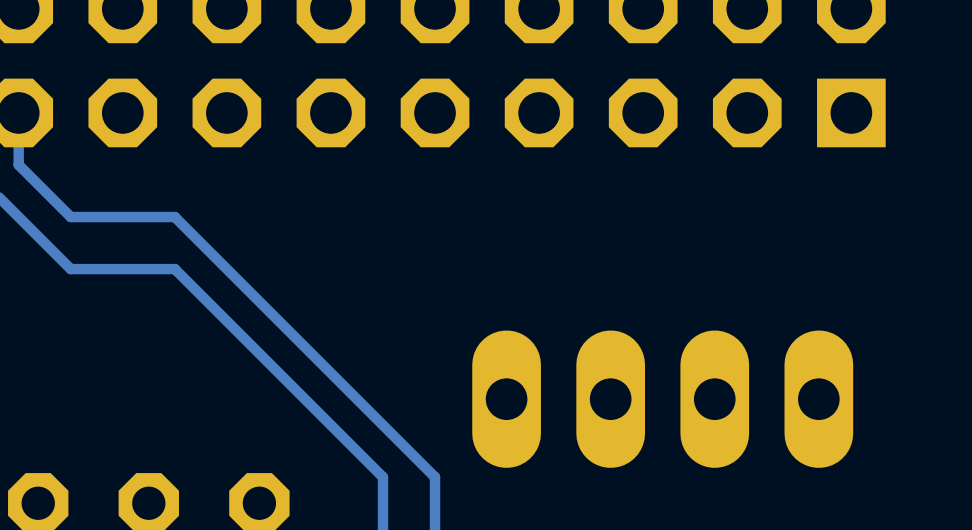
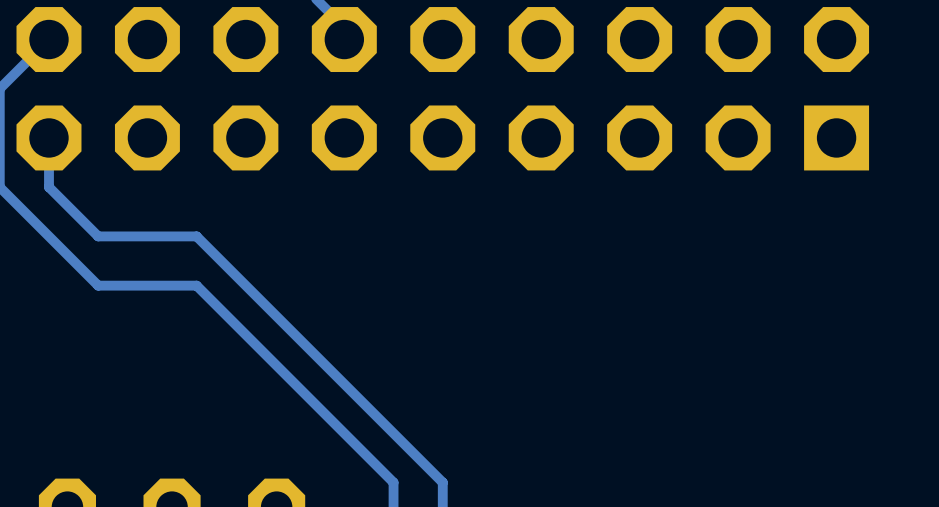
part: (662, 399) -> none

